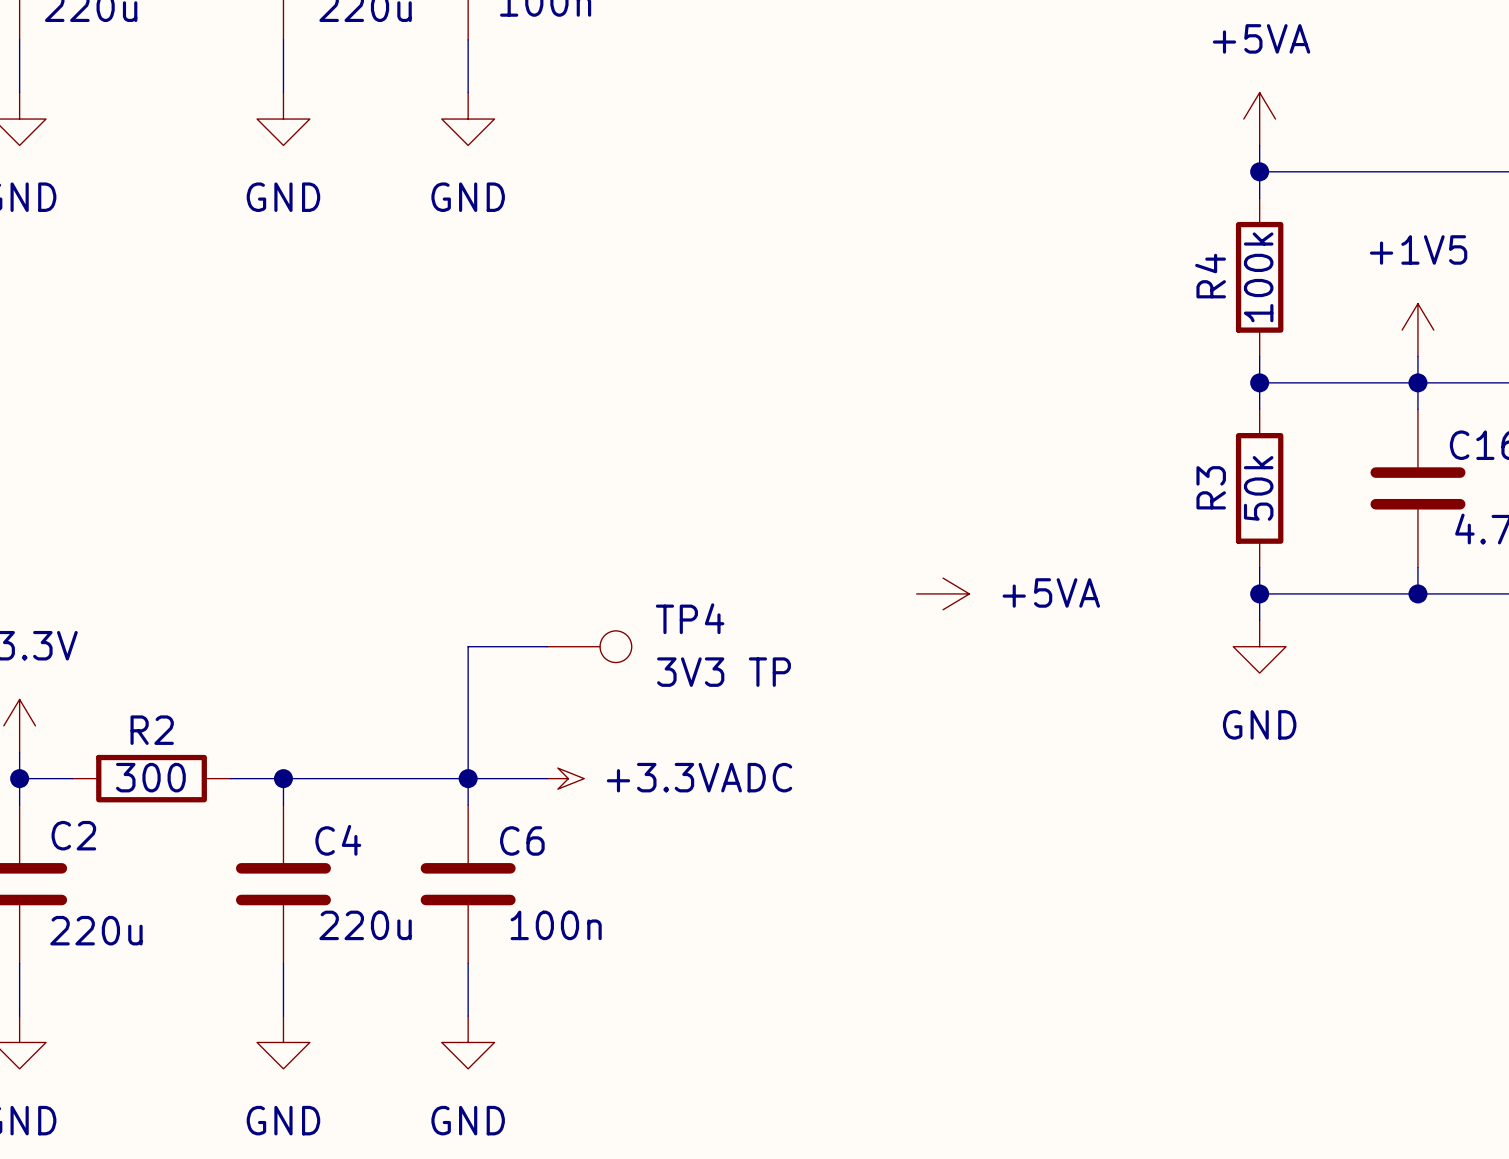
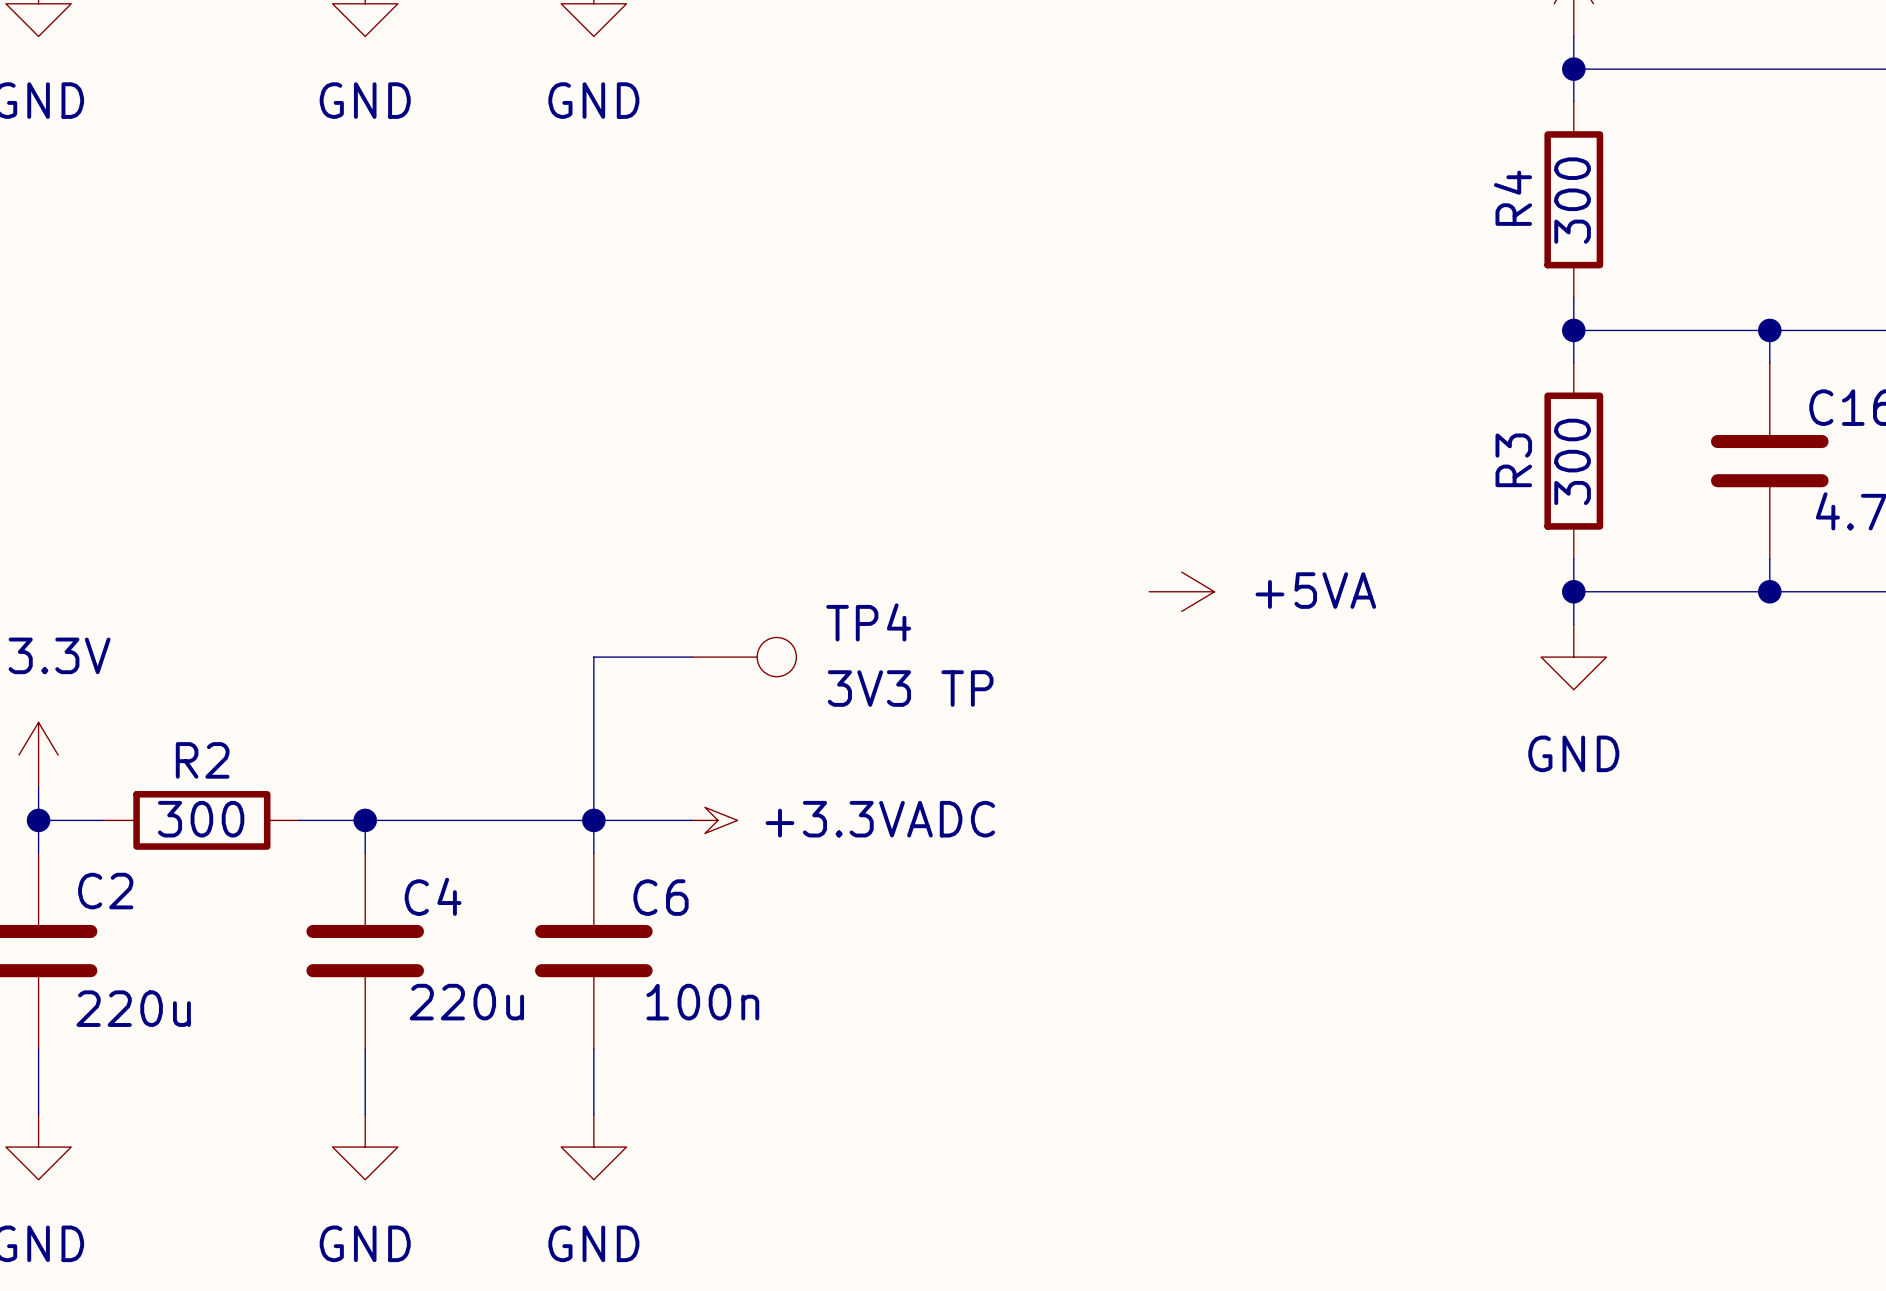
R4 value: 100k (1258, 277) -> 300 (1572, 200)
power symbol: +1V5 (1417, 330) -> none
wire: (1417, 356) (1417, 382) -> none
R3 value: 50k (1258, 488) -> 300 (1572, 461)

